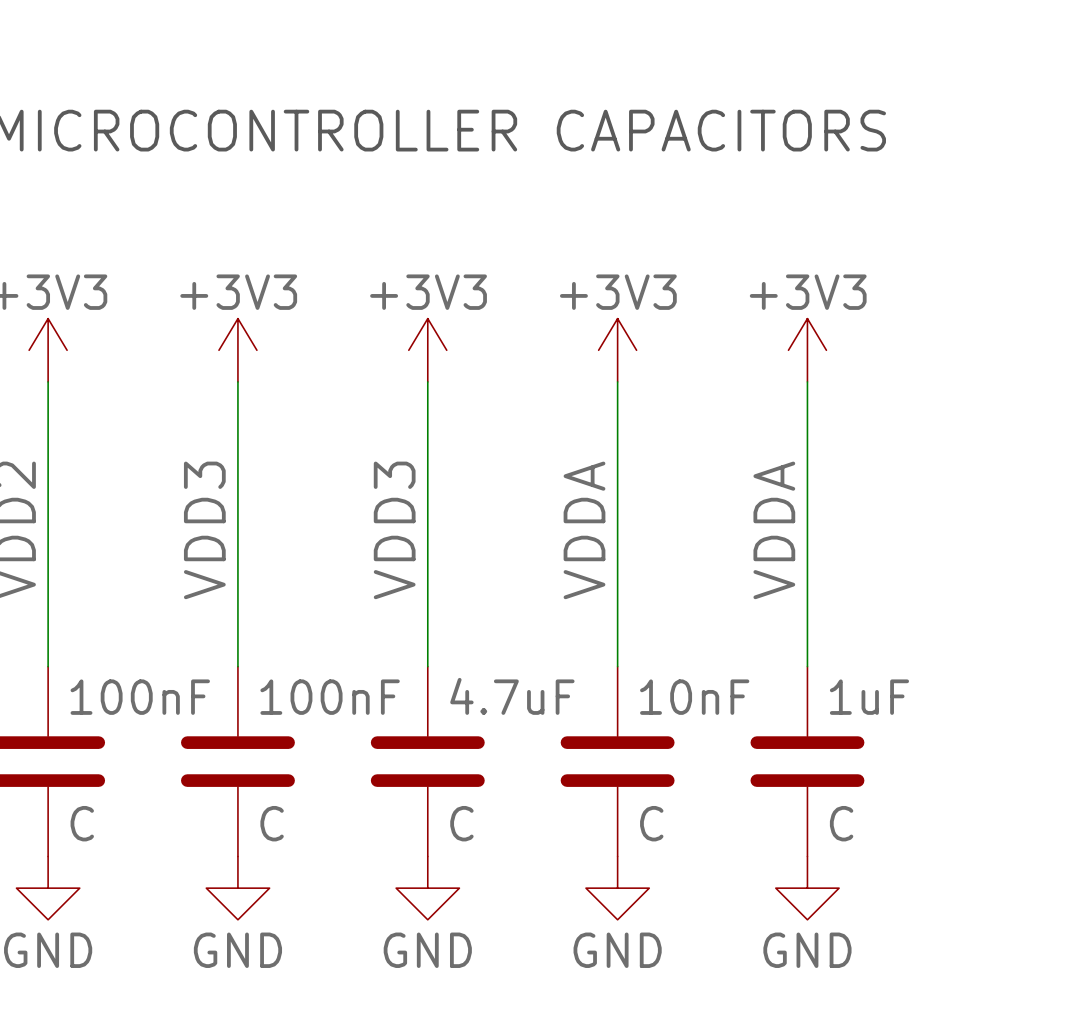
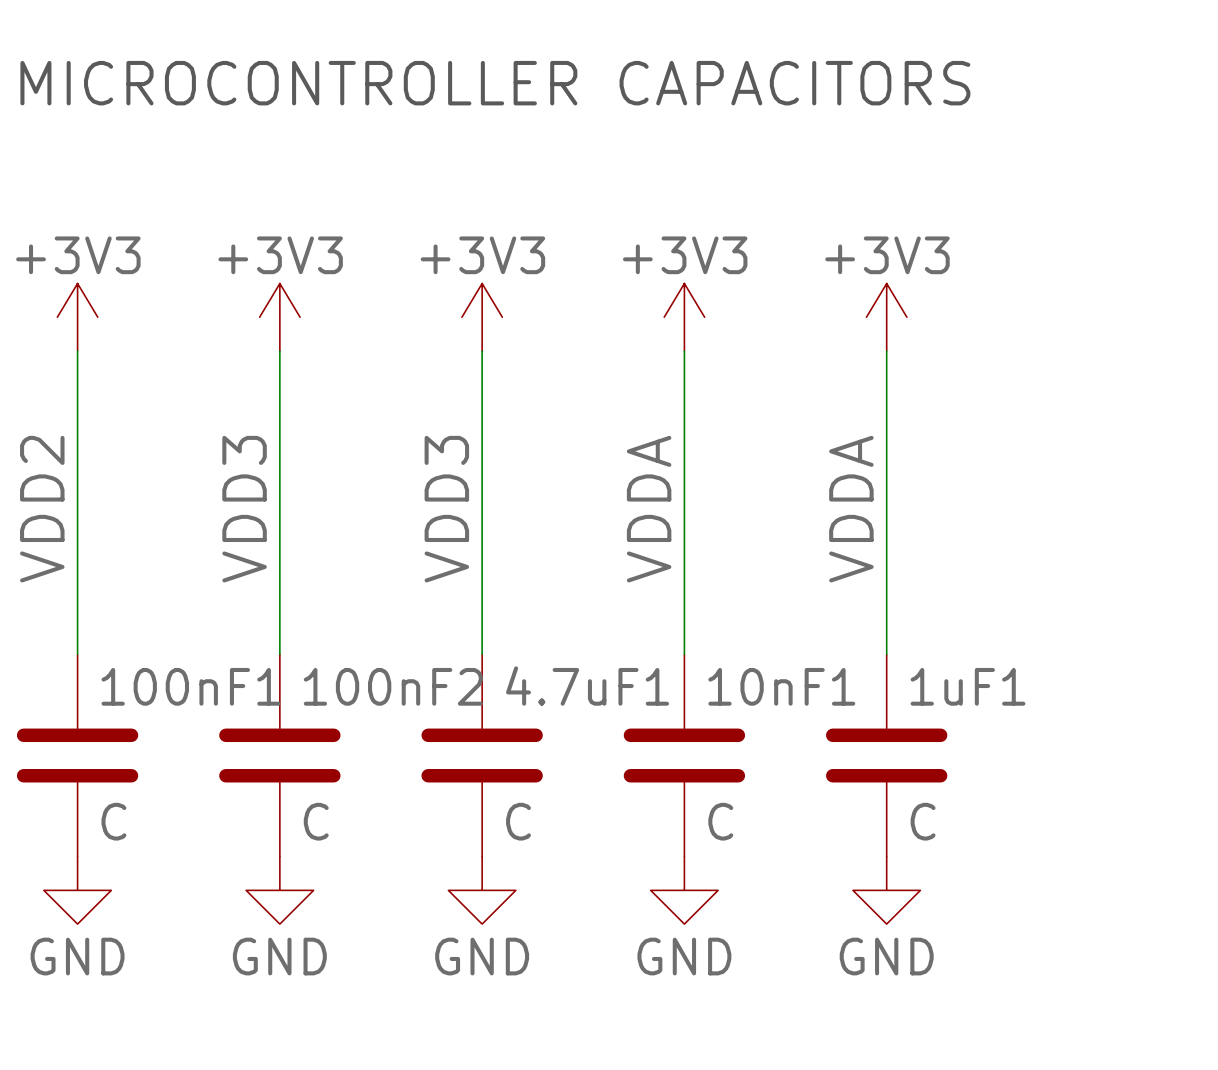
4.7uF name: 4.7uF (512, 696) -> 4.7uF1 (587, 686)
100nF name: 100nF (140, 697) -> 100nF1 (191, 686)
100nF name: 100nF (330, 697) -> 100nF2 (393, 686)
10nF name: 10nF (694, 697) -> 10nF1 (781, 686)
1uF name: 1uF (869, 697) -> 1uF1 (968, 686)

